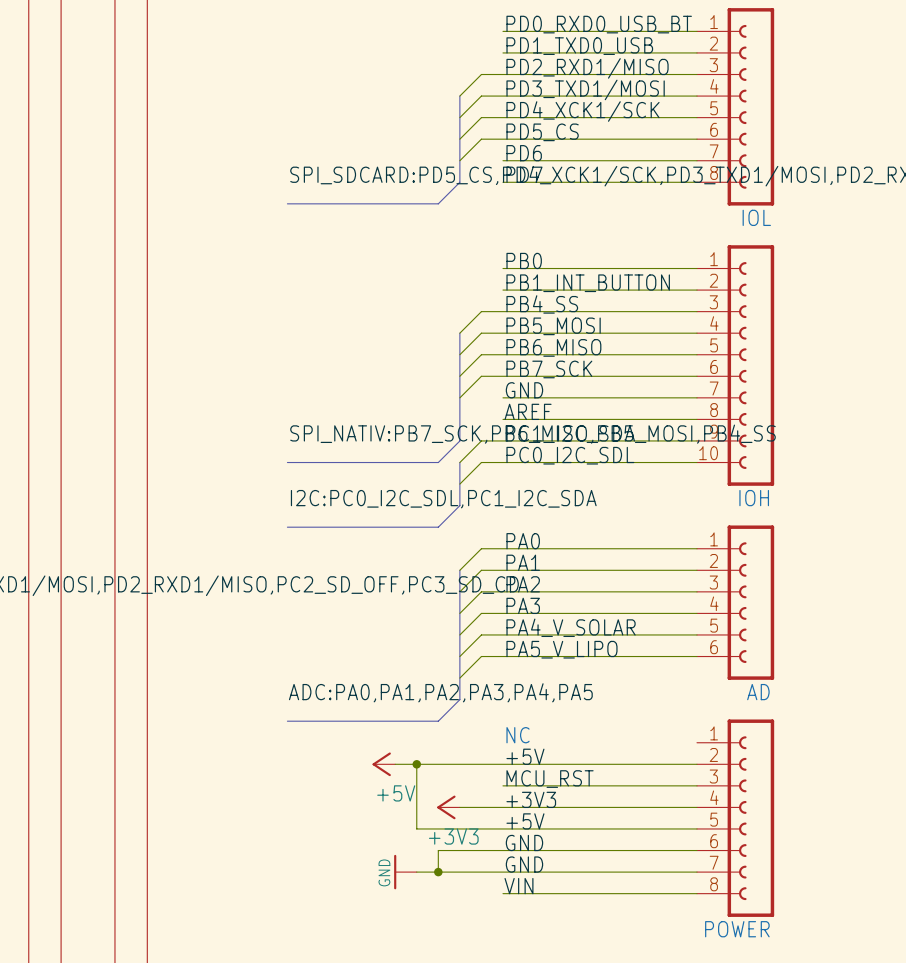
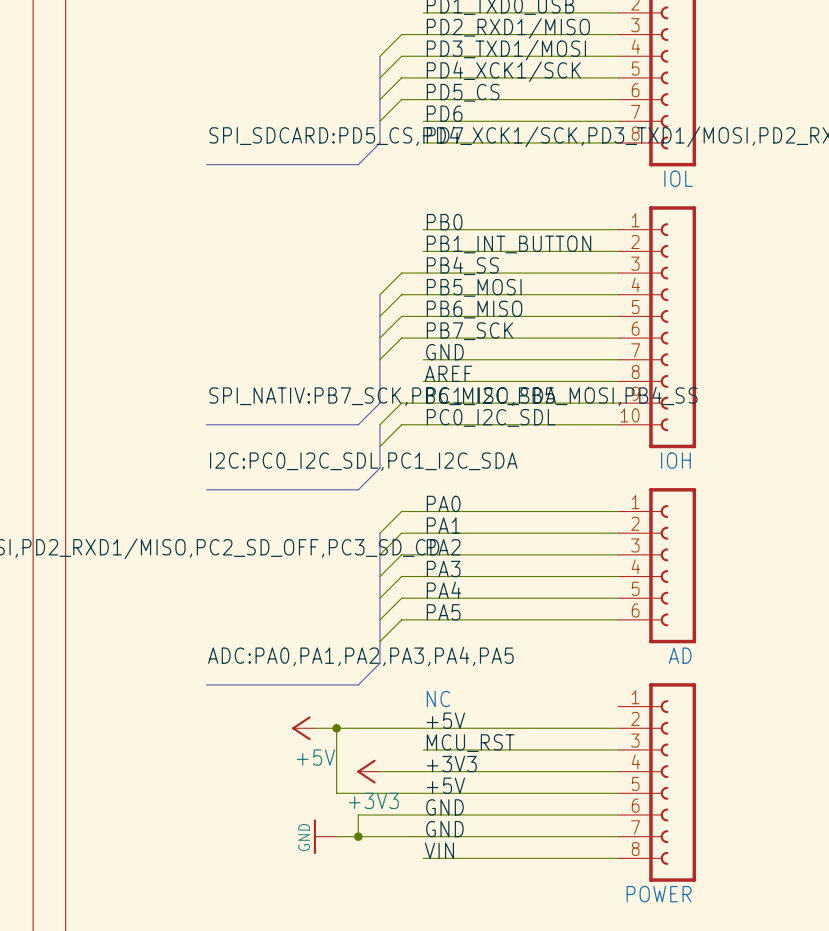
label: PA4_V_SOLAR (571, 627) -> PA4 (443, 590)
label: PA5_V_LIPO (561, 649) -> PA5 (443, 612)

